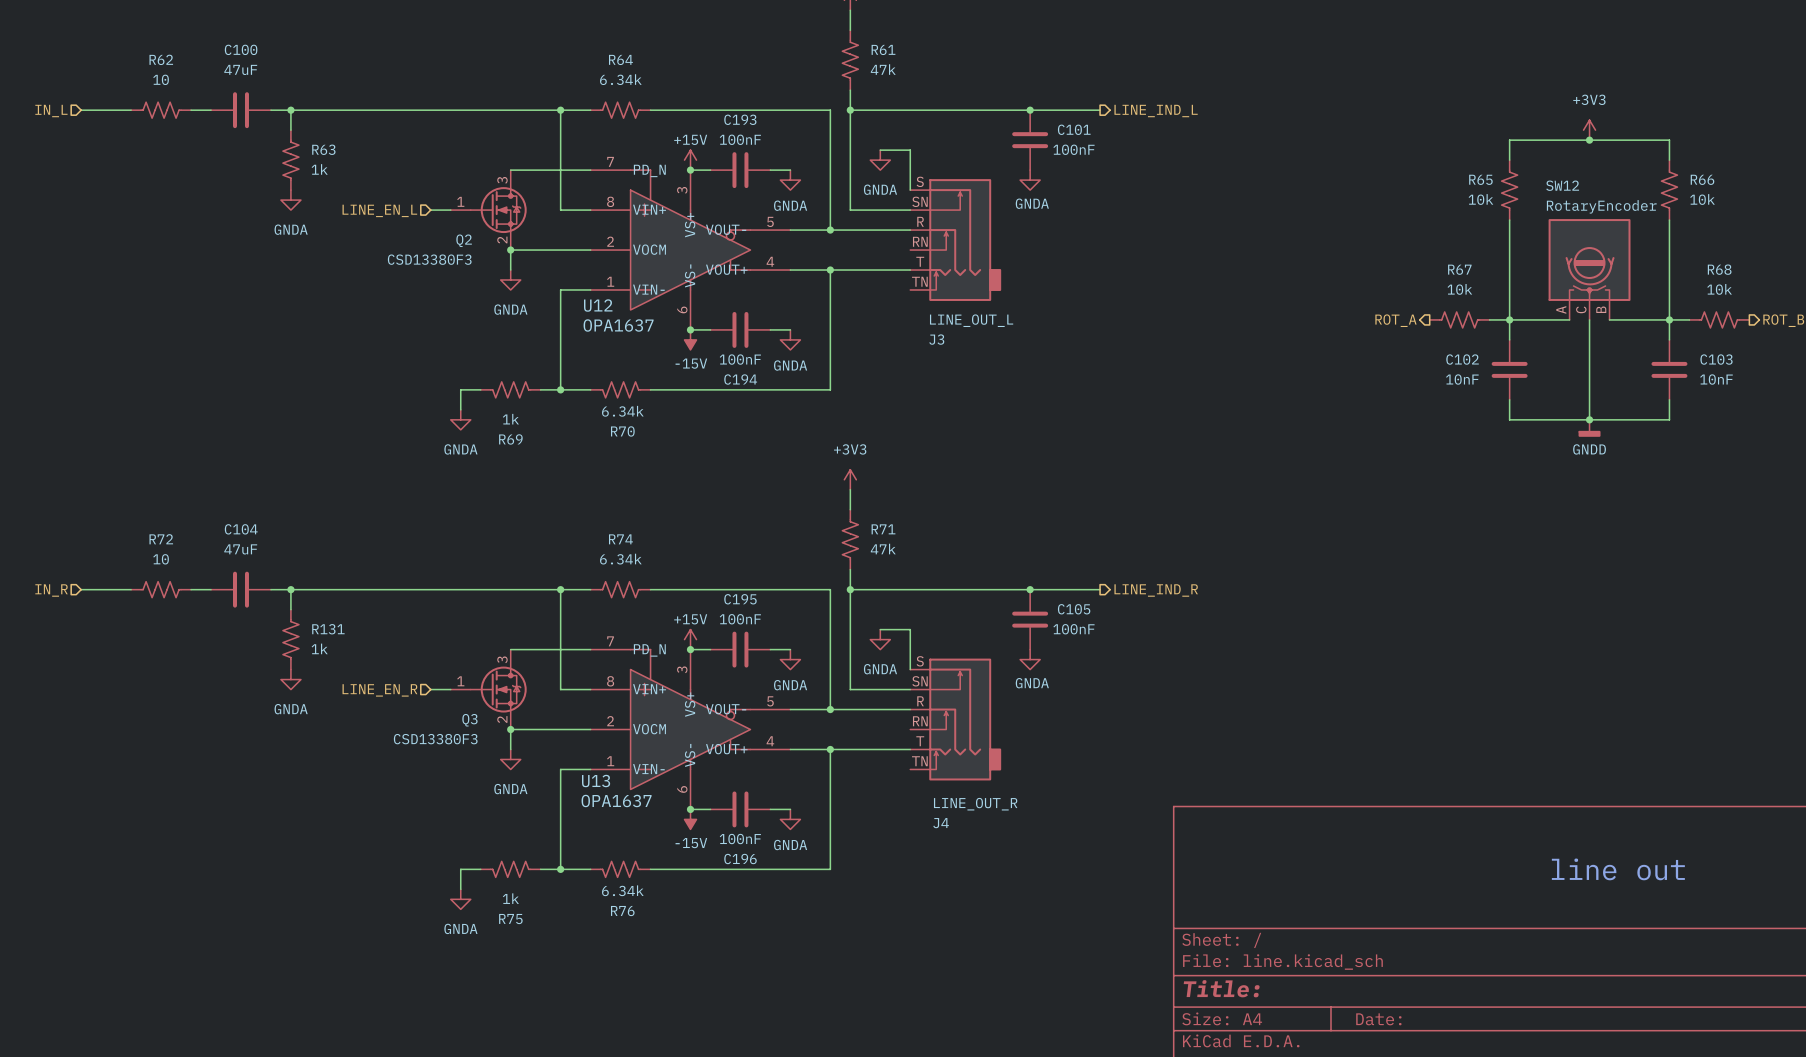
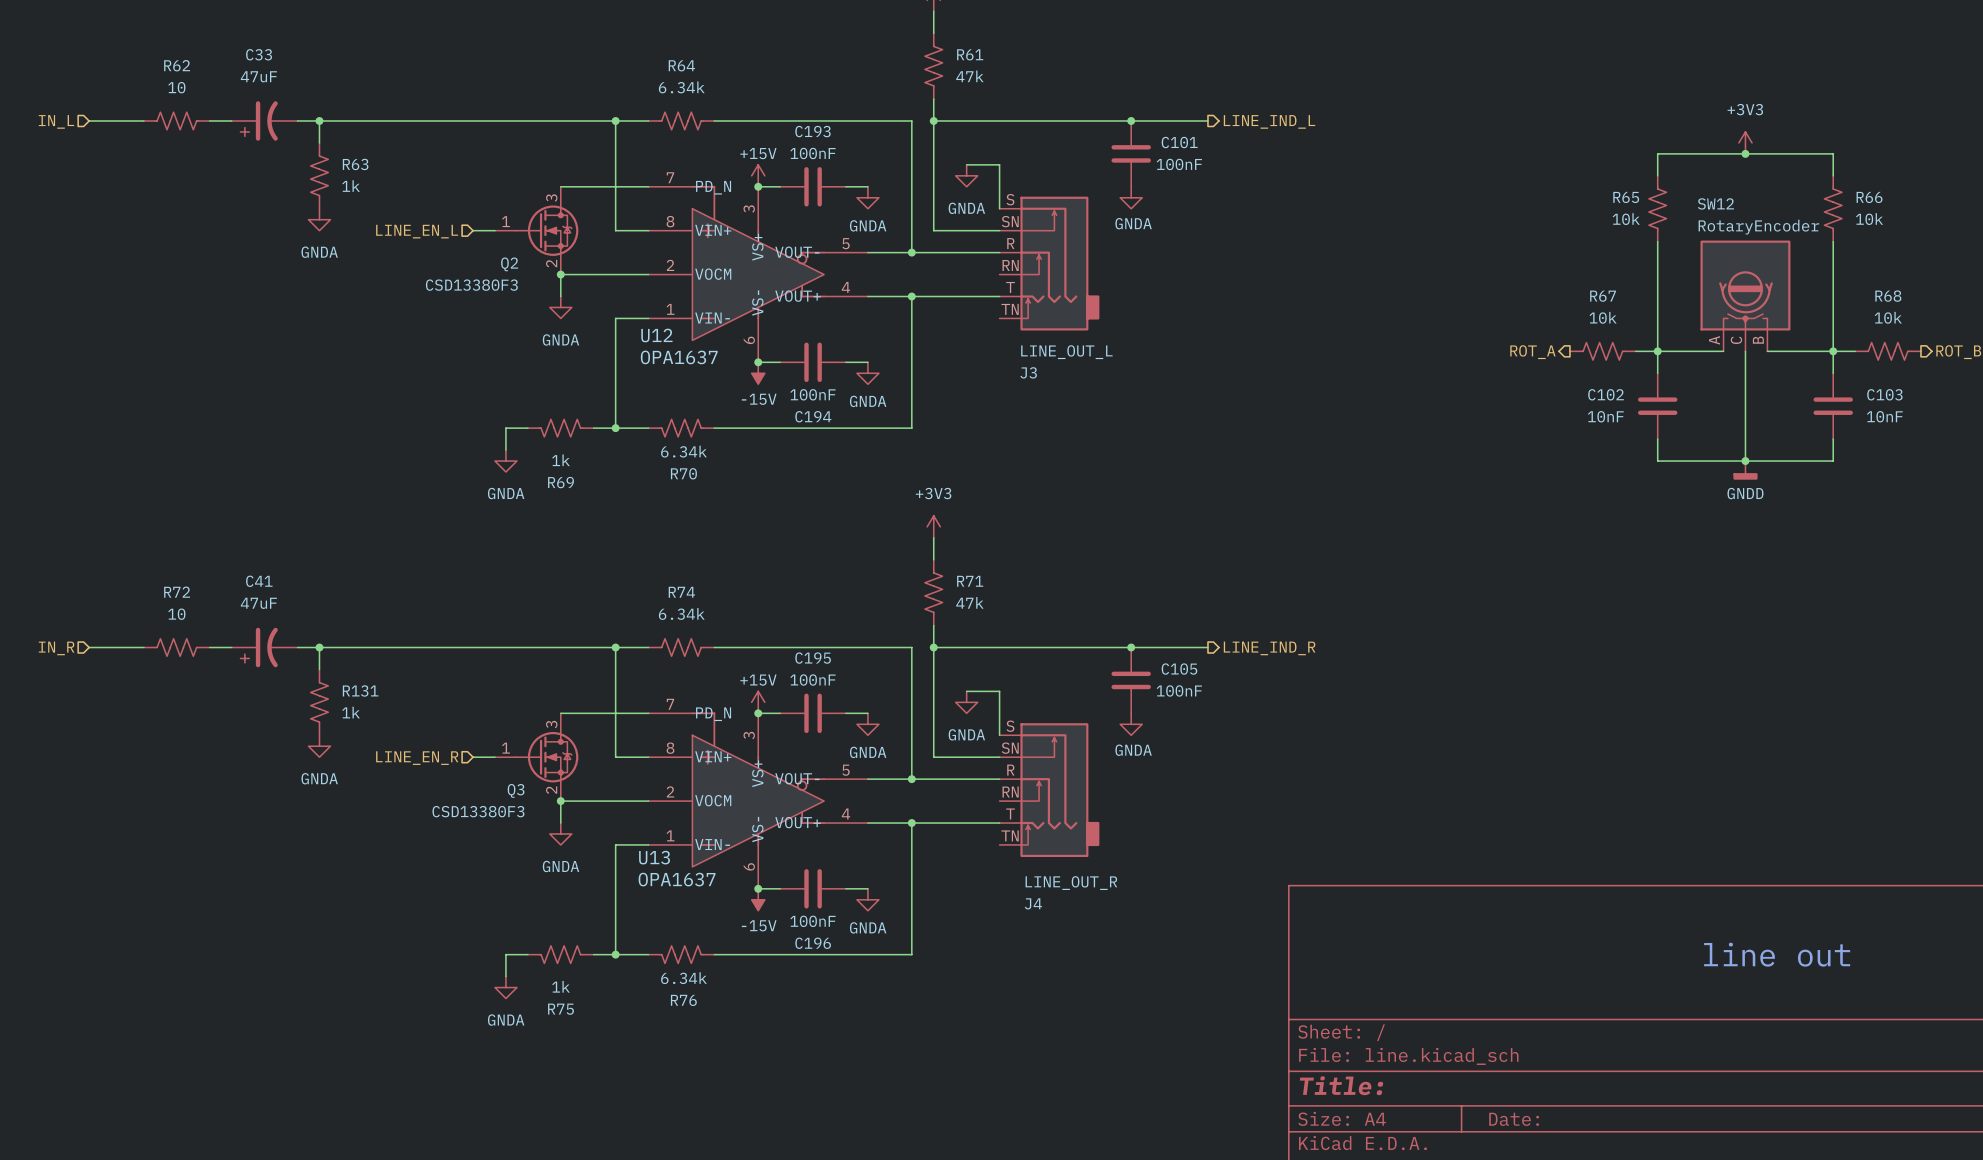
C100: 47uF (240, 110) -> none
C33: none -> 47uF (264, 120)
C104: 47uF (240, 589) -> none
C41: none -> 47uF (264, 647)

